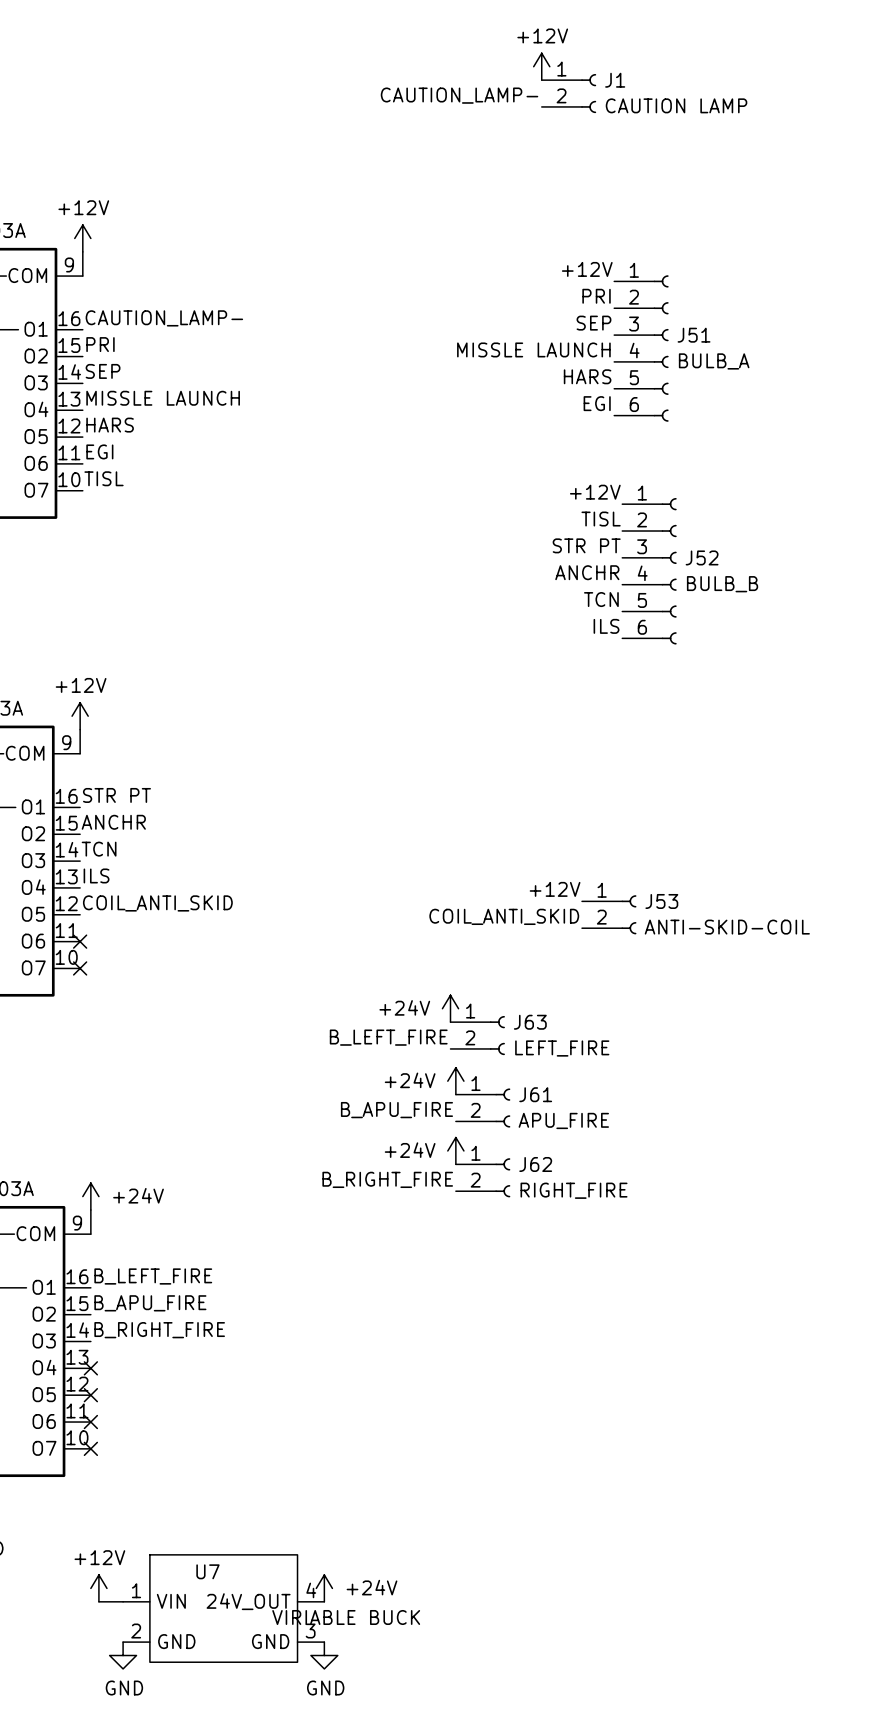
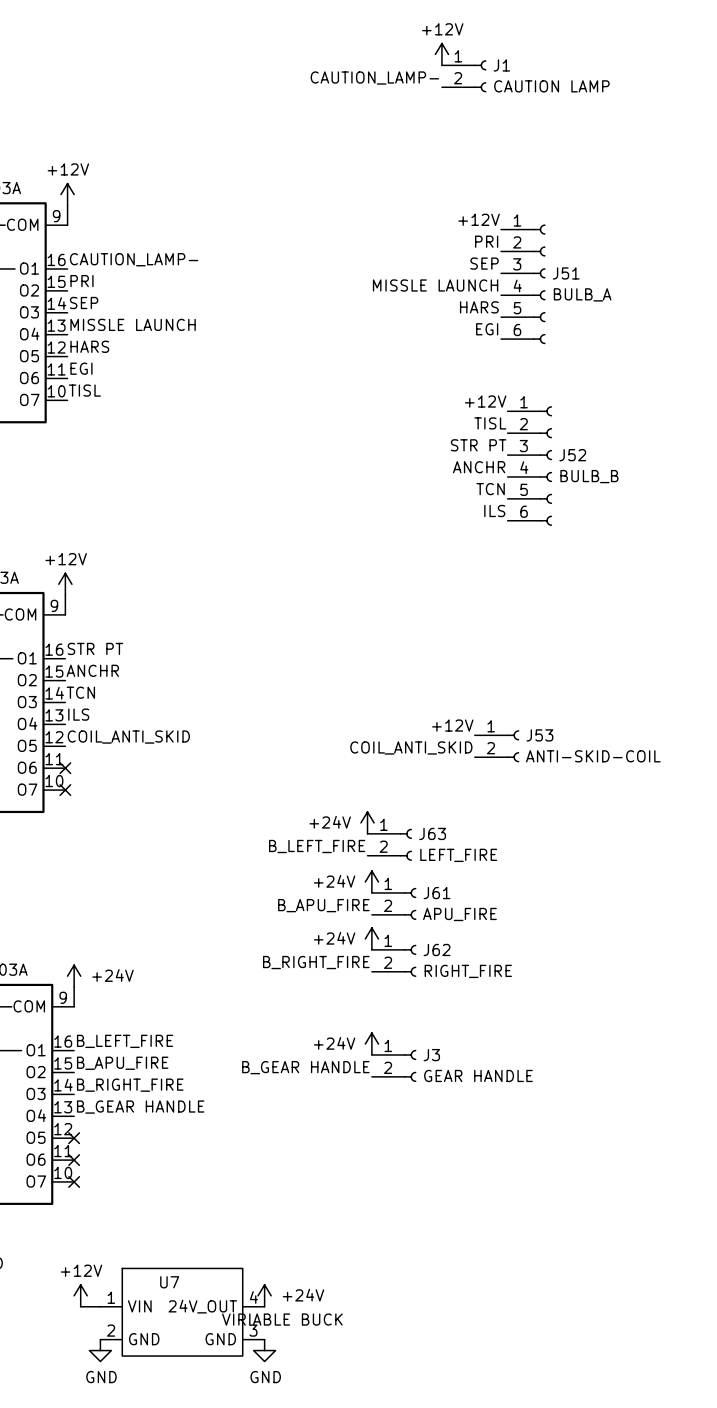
power symbol: none -> +24V (371, 1044)
J3: none -> GEAR HANDLE (394, 1065)
label: none -> B_GEAR HANDLE (305, 1067)
label: none -> B_GEAR HANDLE (140, 1107)
no-connect mark: (90, 1368) -> none

